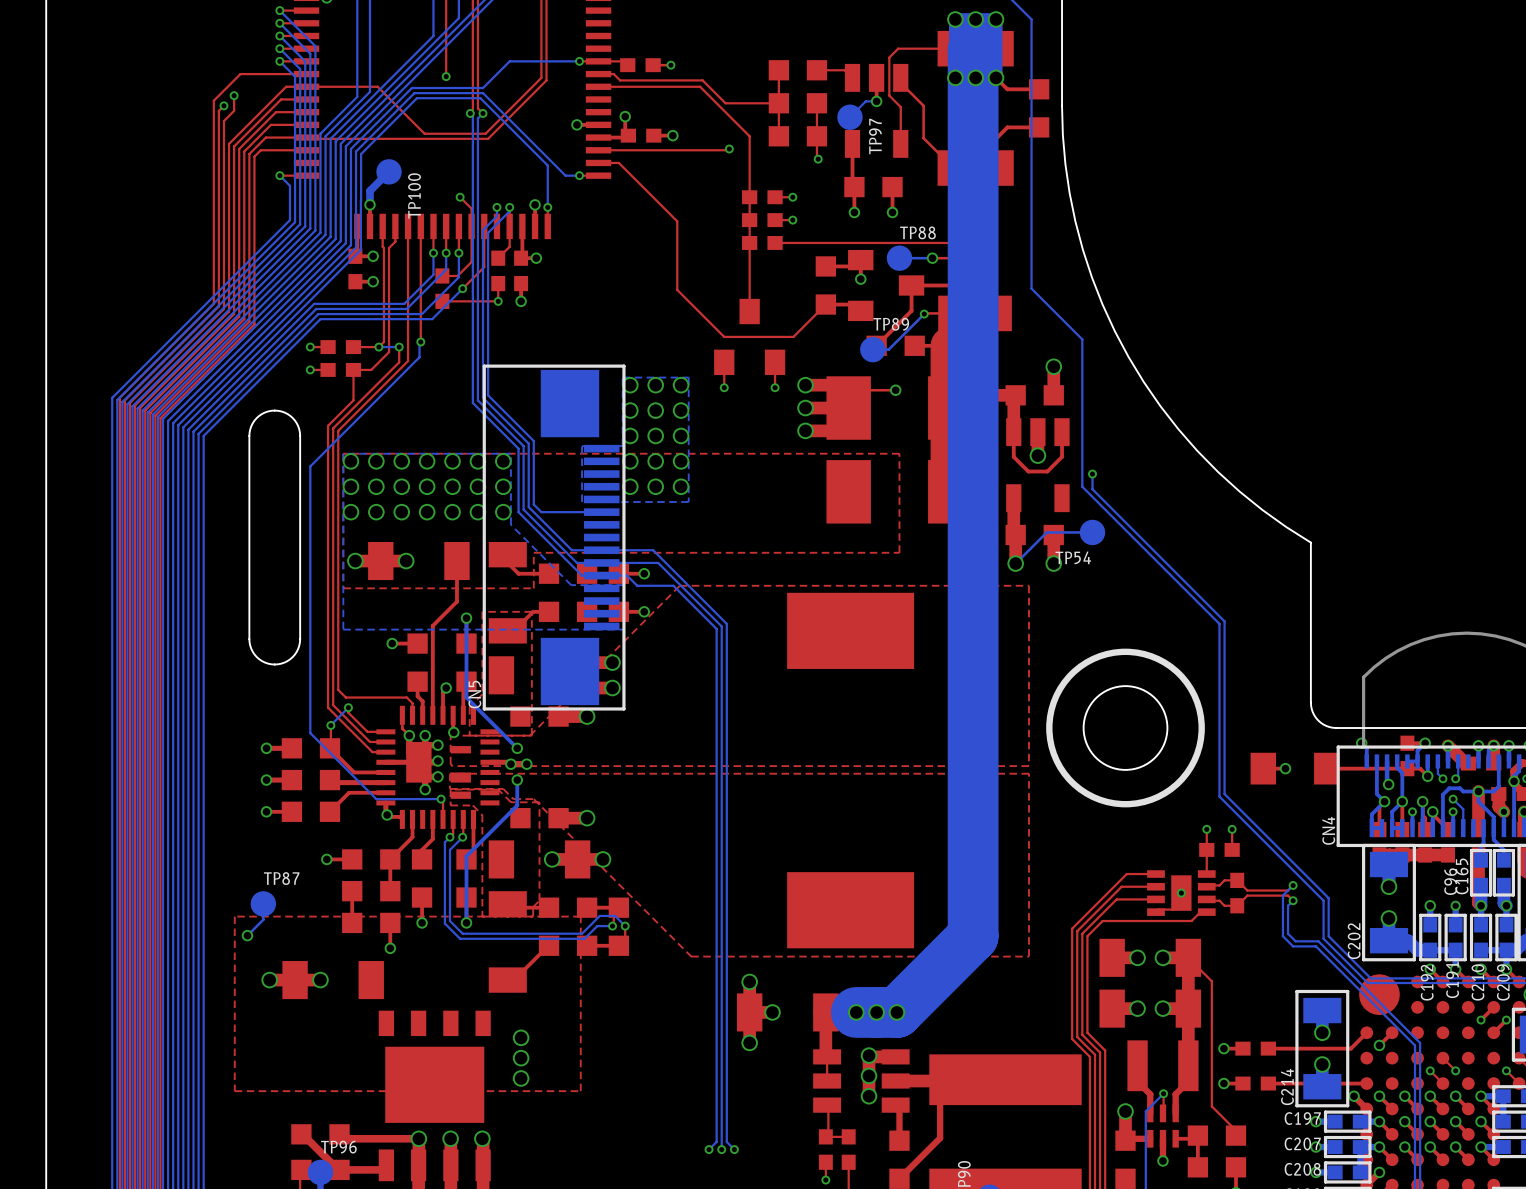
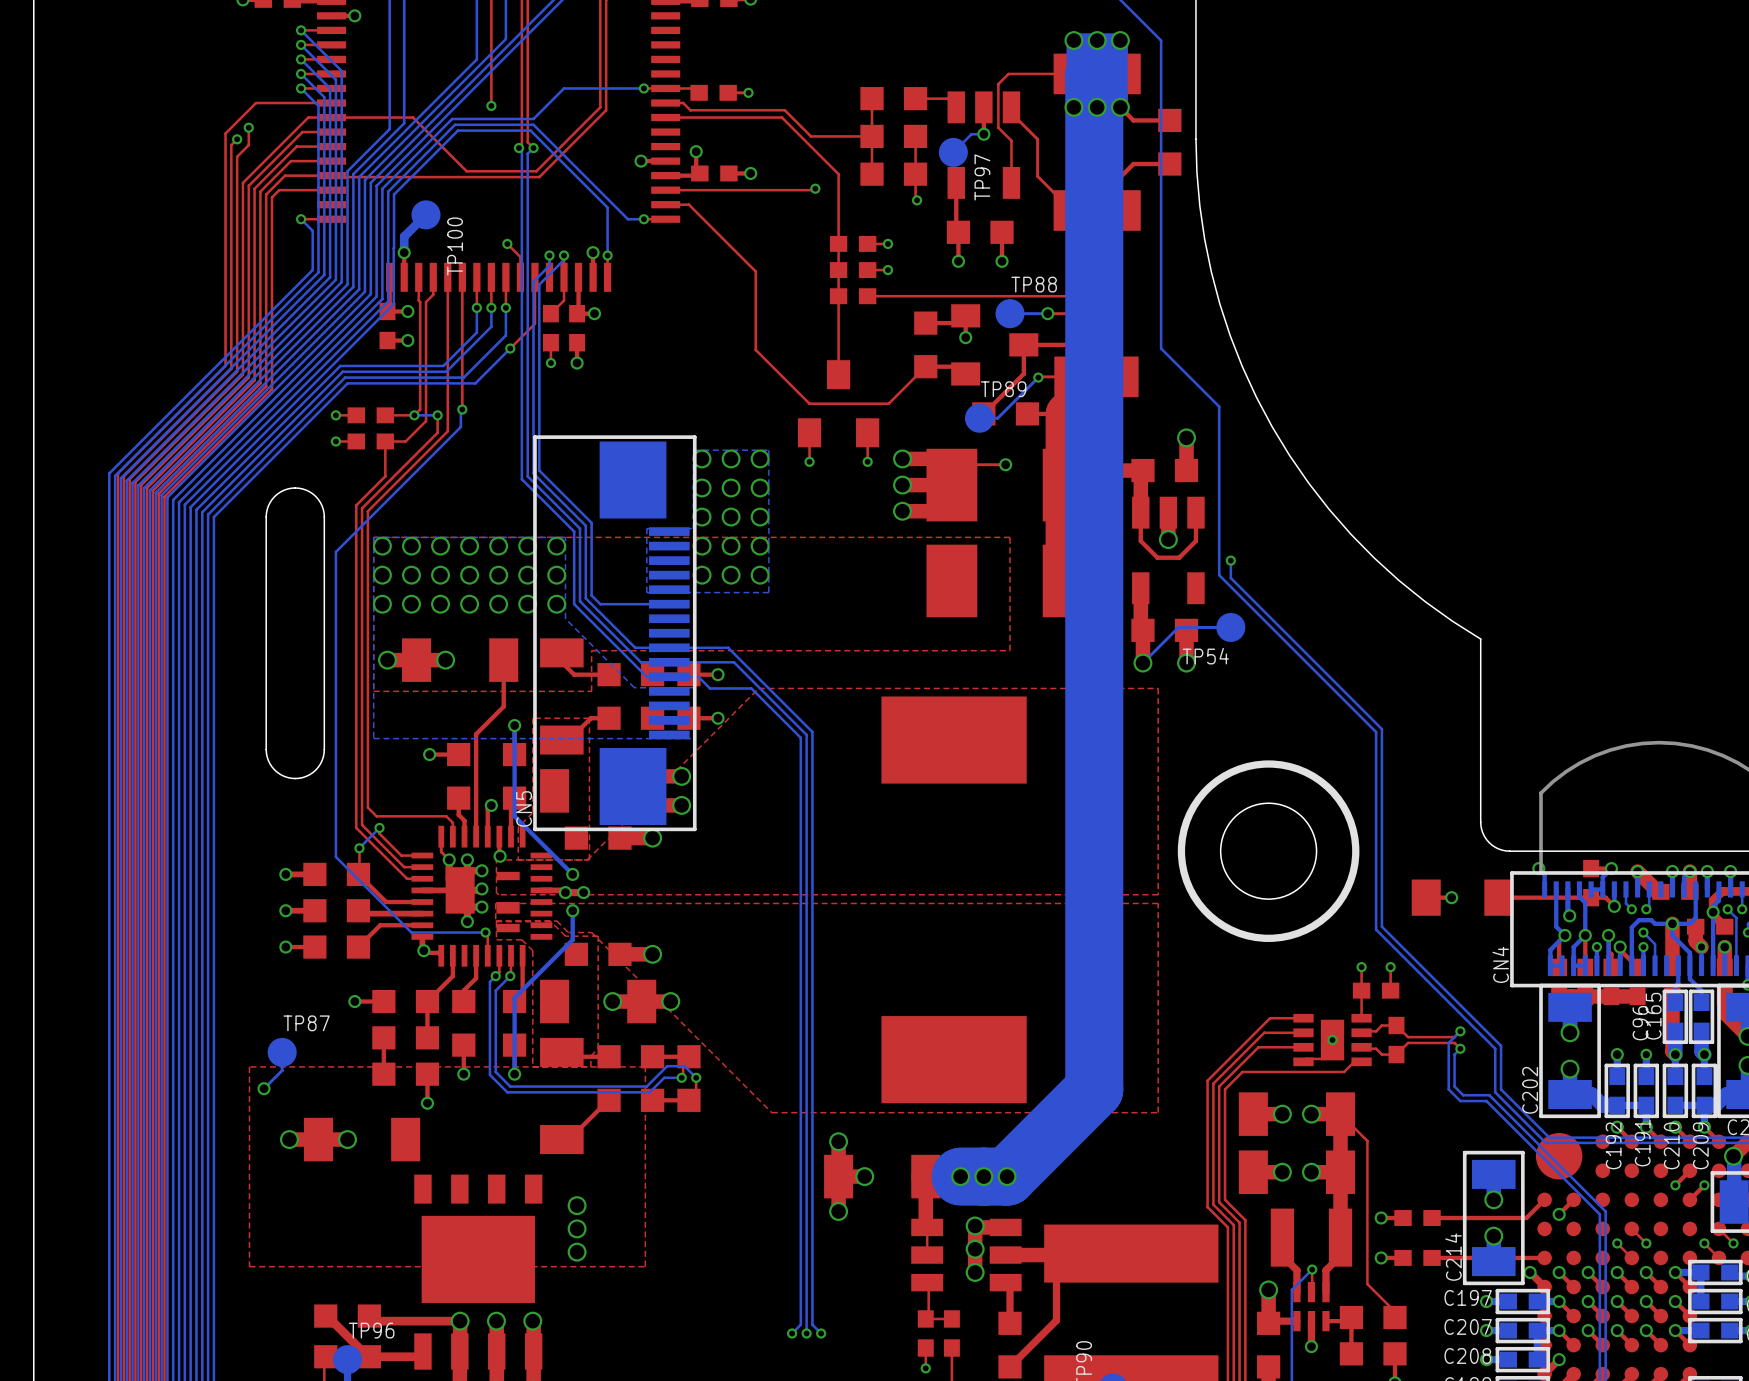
top track: (471, 226) (471, 262) (457, 275) (442, 275) -> none
part: (442, 288) -> none
top track: (498, 301) (442, 301) -> none

